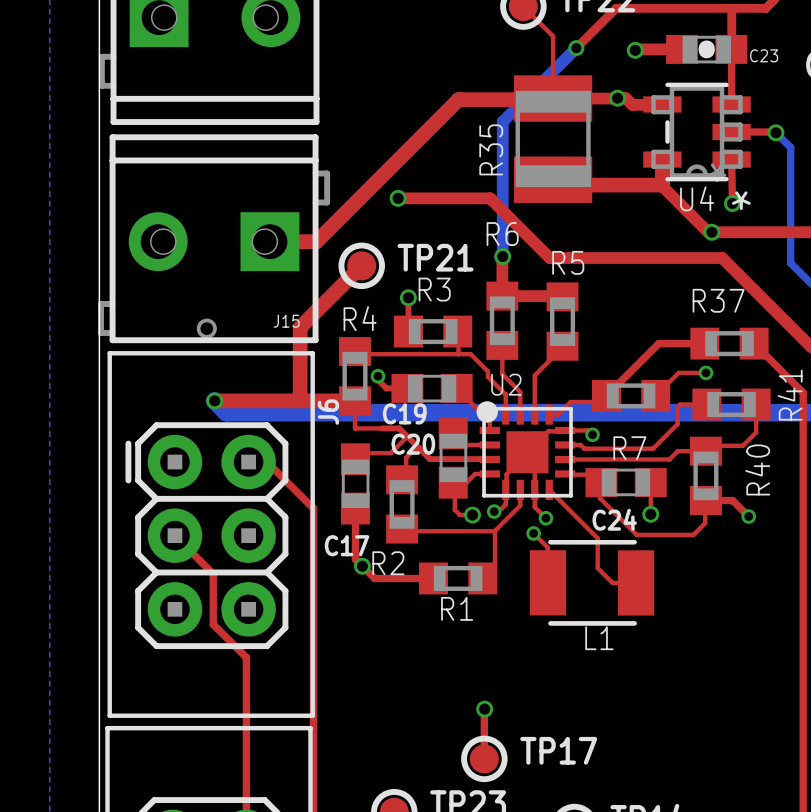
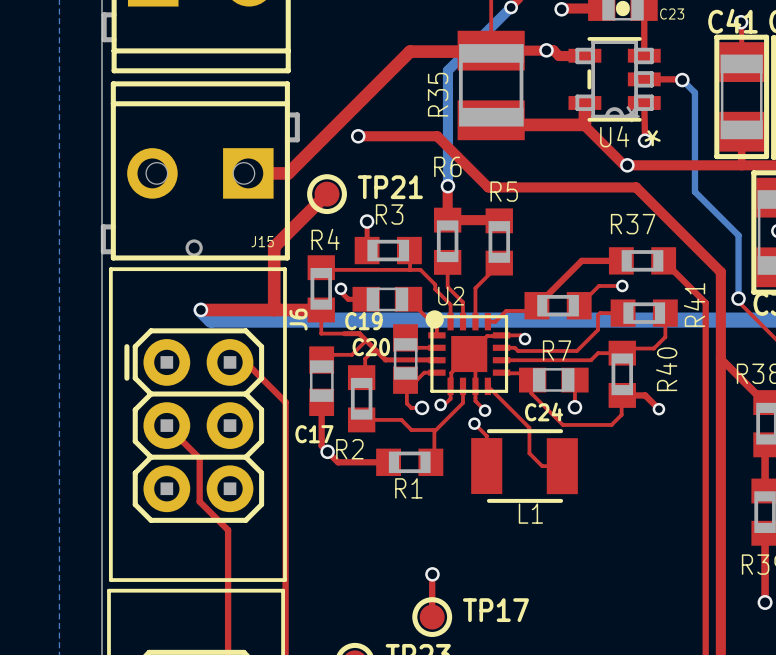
top track: (520, 505) (494, 531) (404, 531) (402, 529) -> (434, 458) (434, 430) (411, 430) (401, 419) (361, 419)
top track: none -> (463, 399) (463, 402) (434, 430)
top track: (494, 530) (494, 565) (486, 574) -> none

